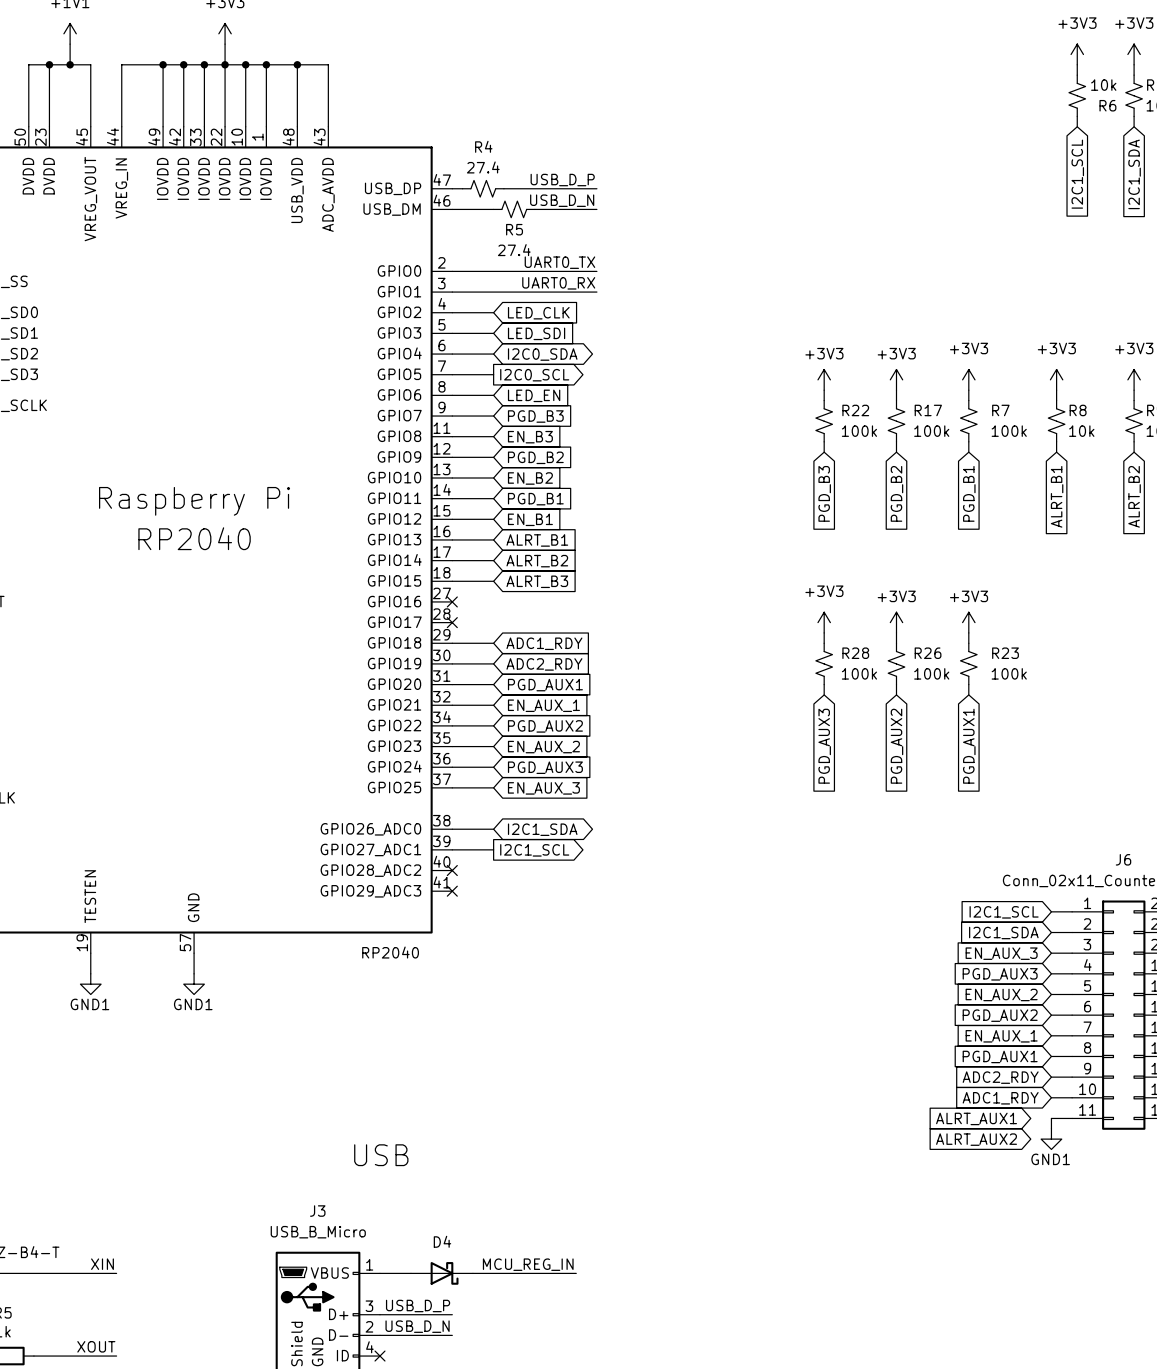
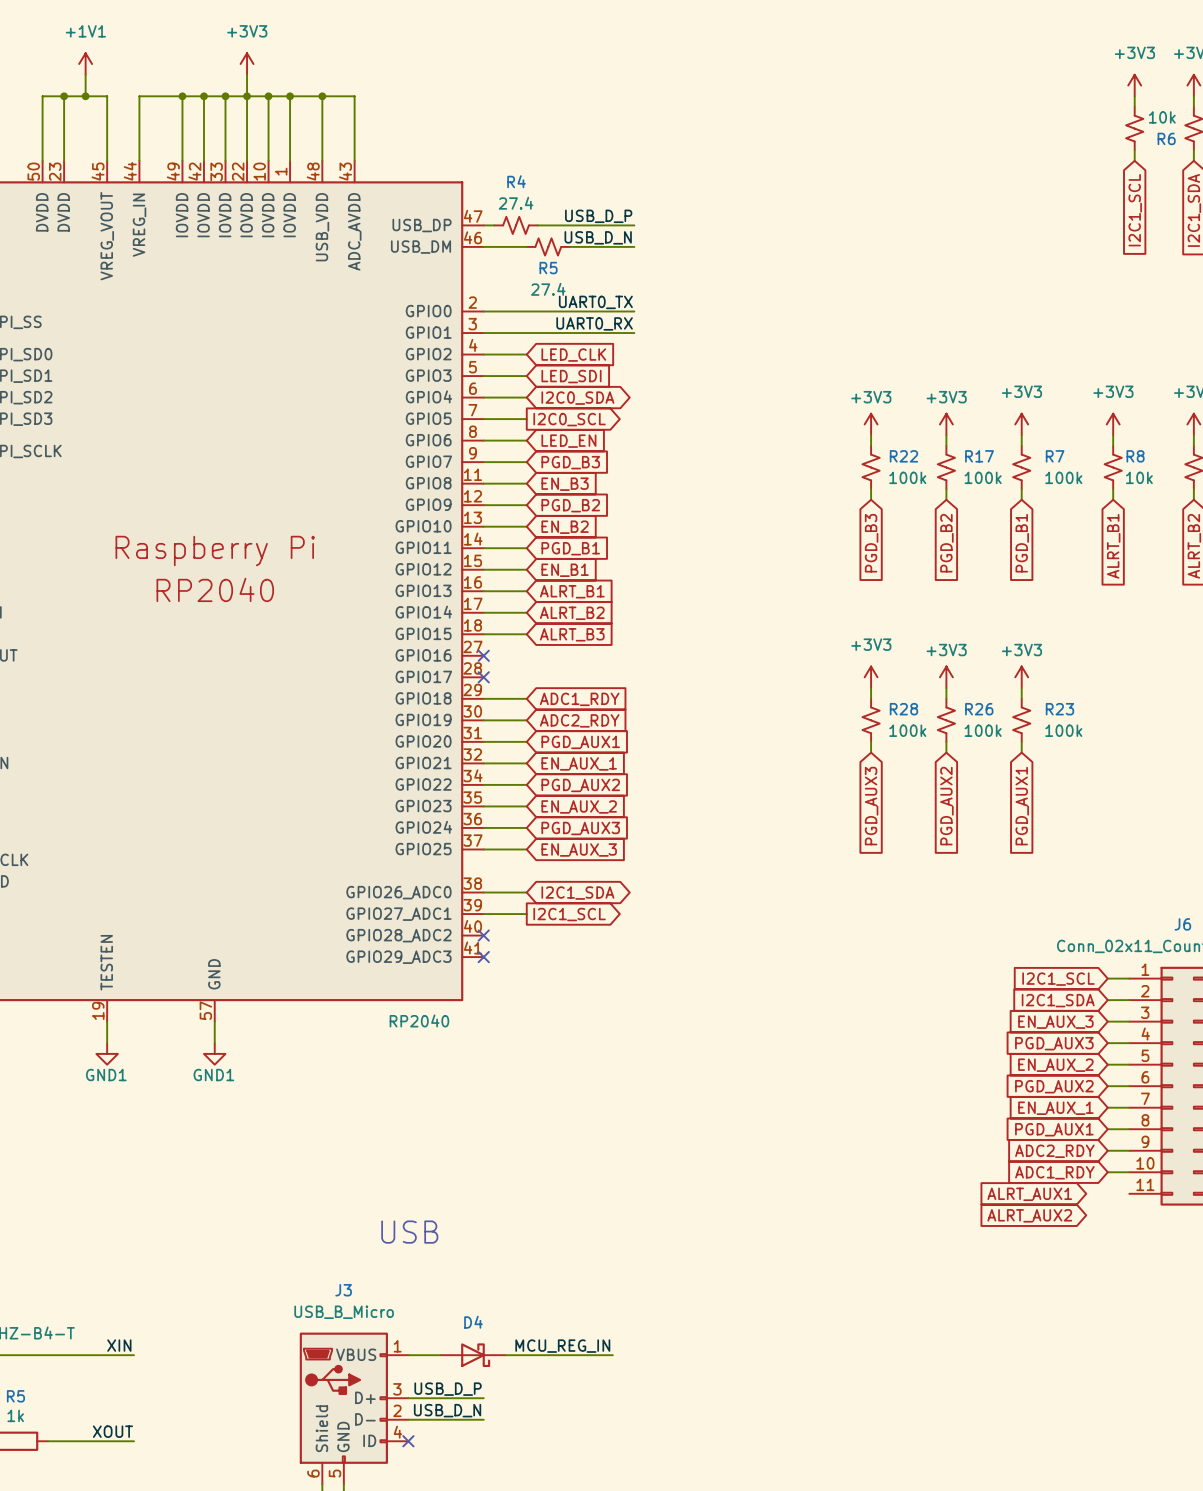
wire: (1072, 1118) (1051, 1118) (1051, 1128) -> none
power symbol: GND1 (1051, 1139) -> none

